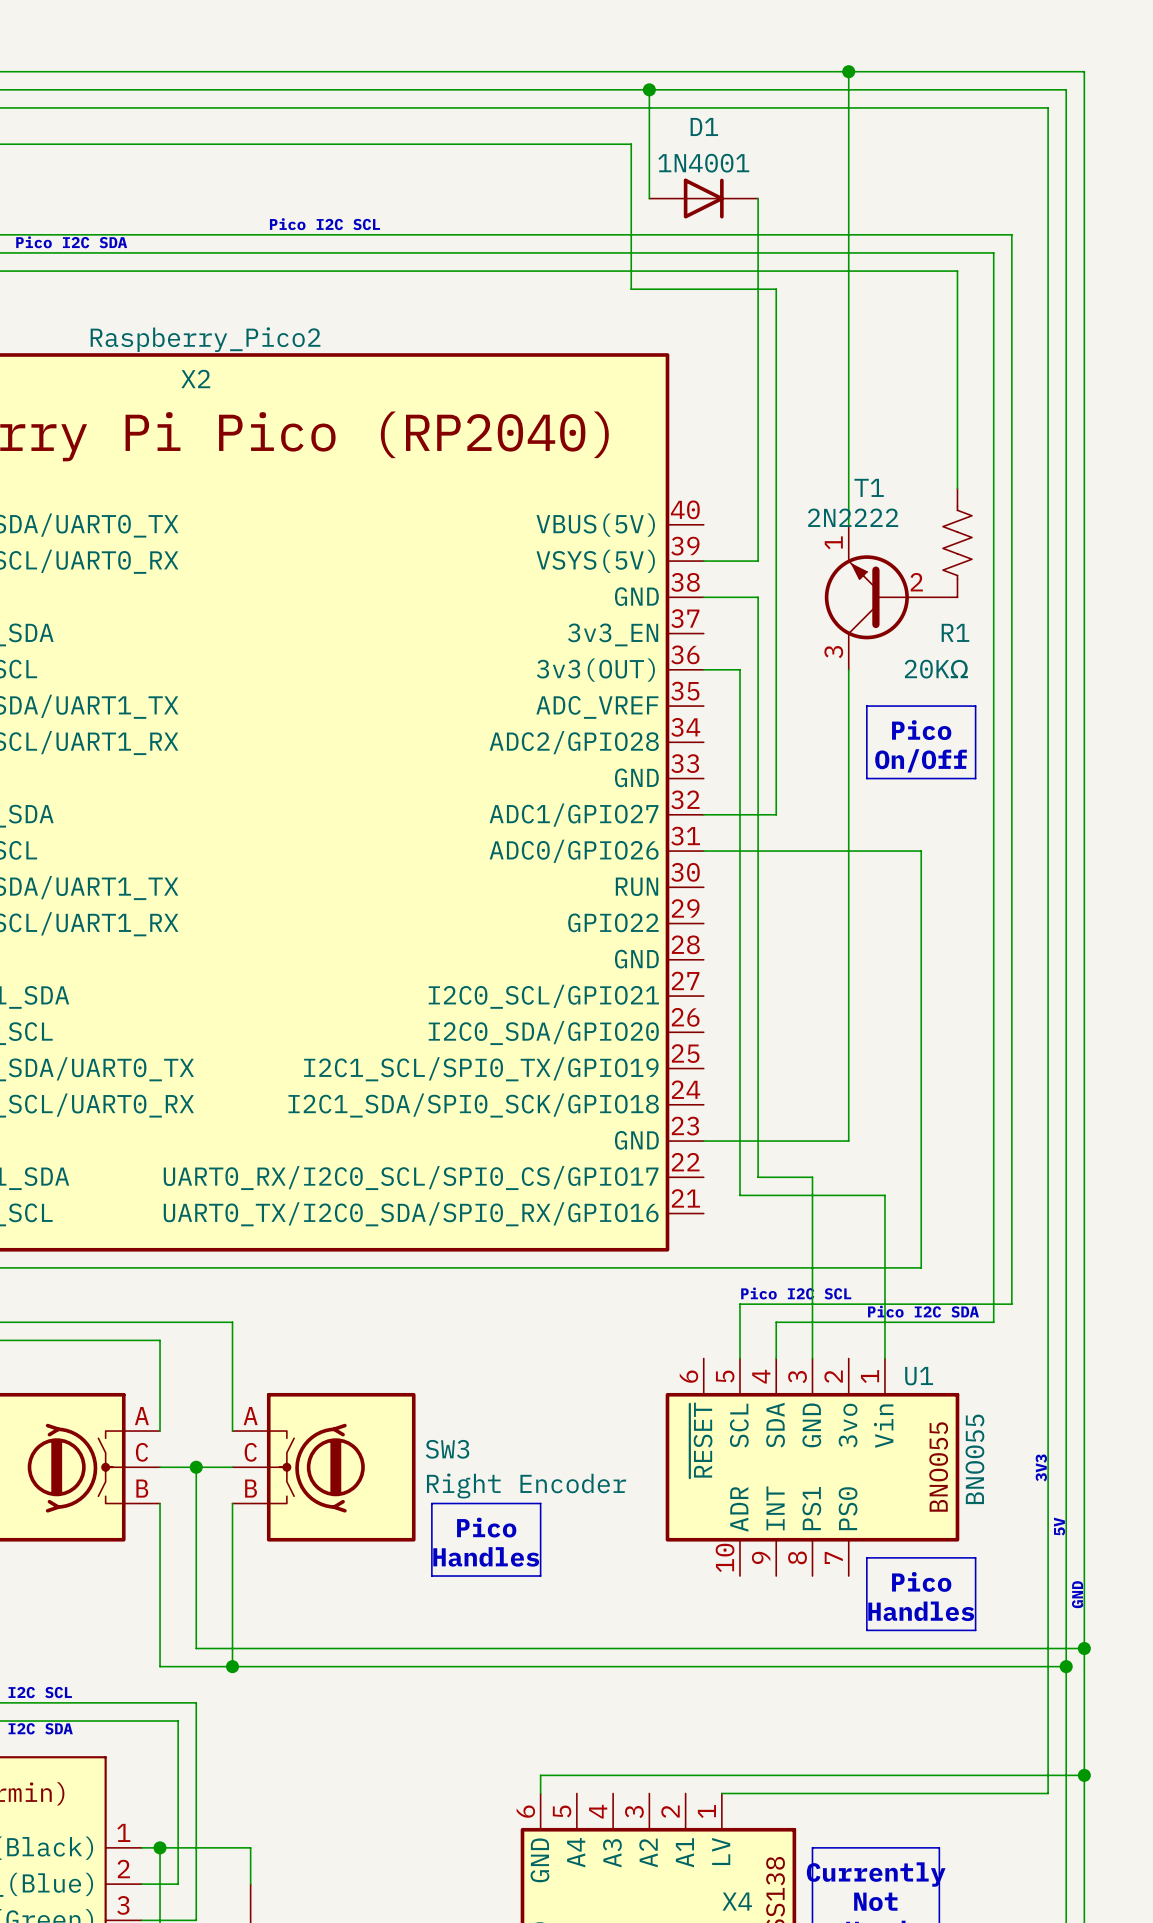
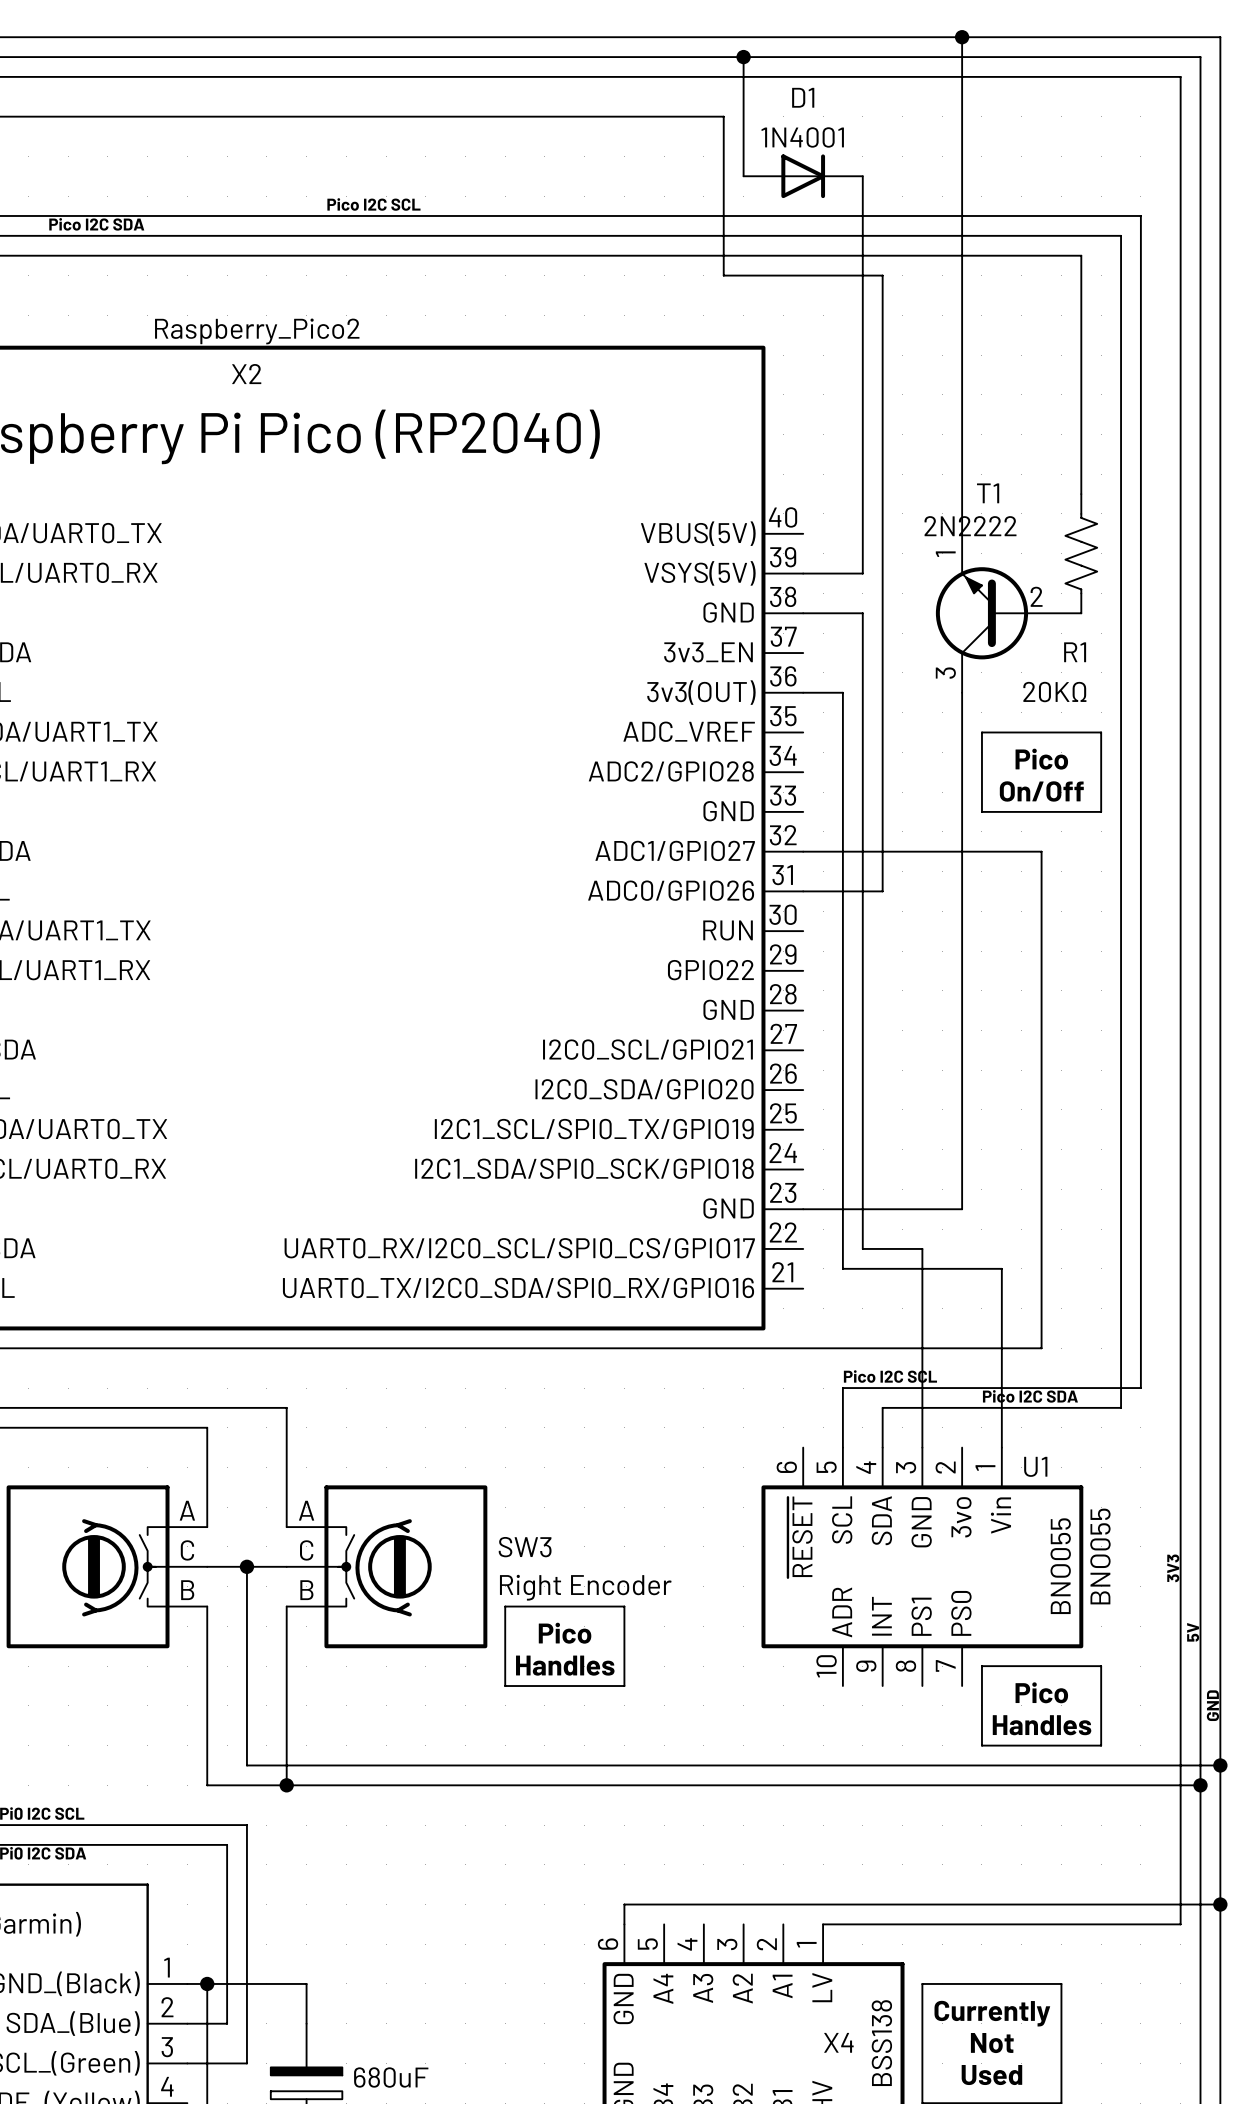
wire: (776, 851) (921, 851) -> (882, 891) (882, 851) (1041, 851) (1041, 891)

